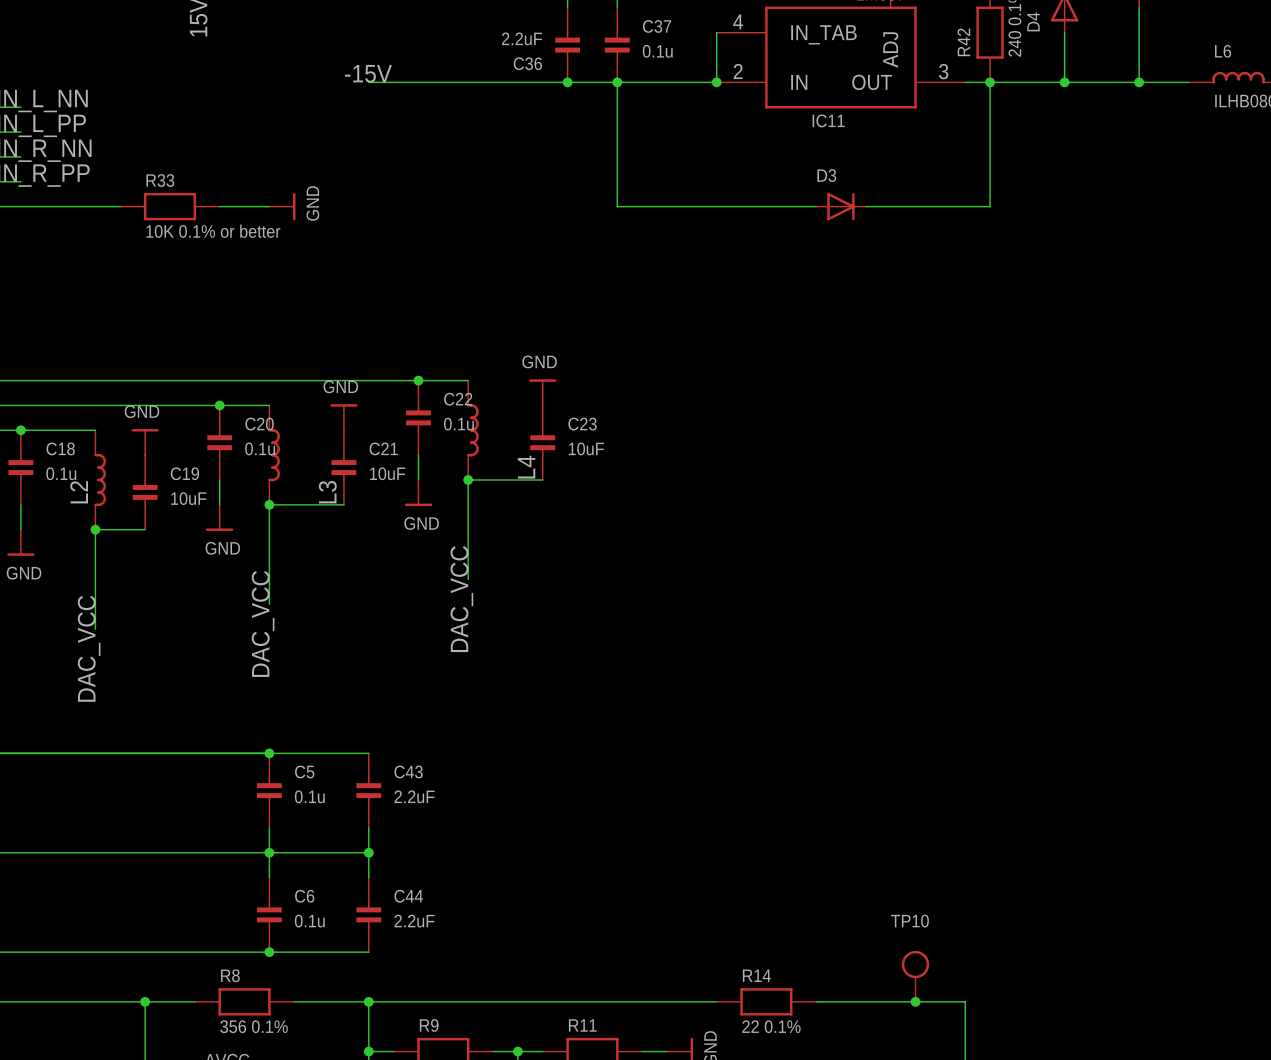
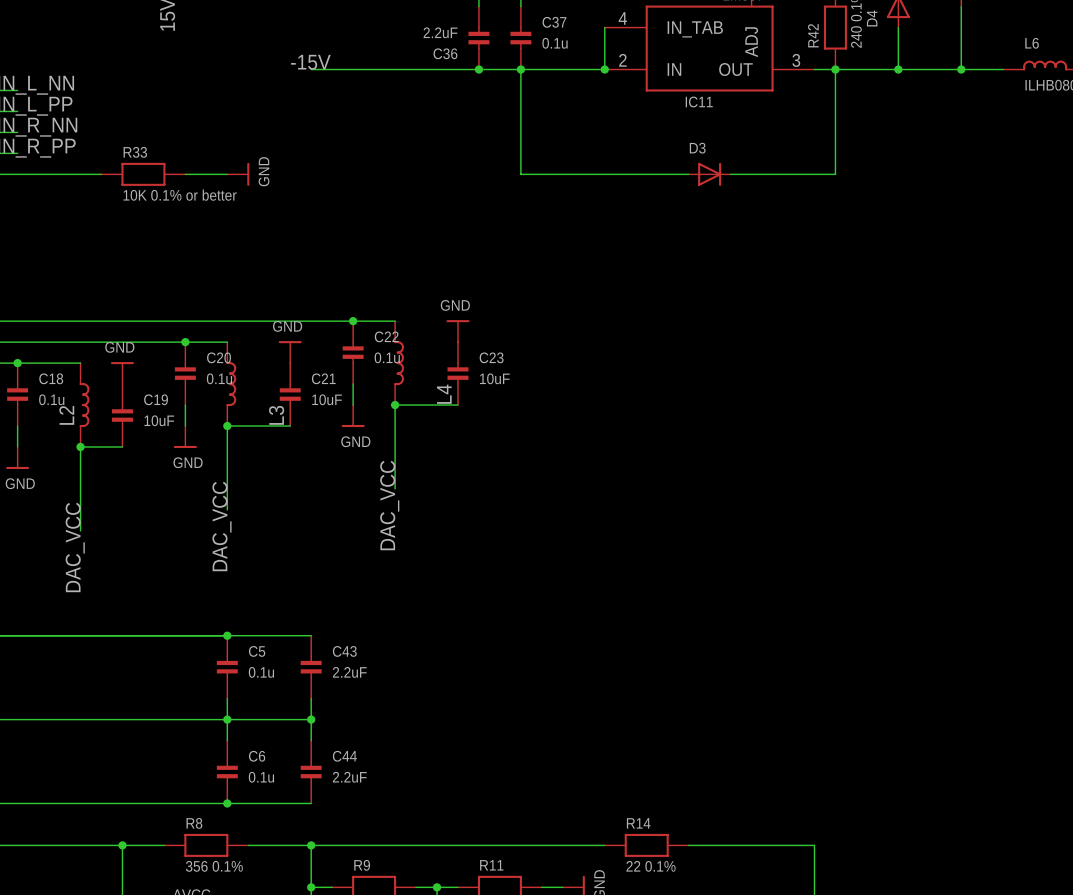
TP10: (915, 976) -> none
junction: (915, 1001) -> none

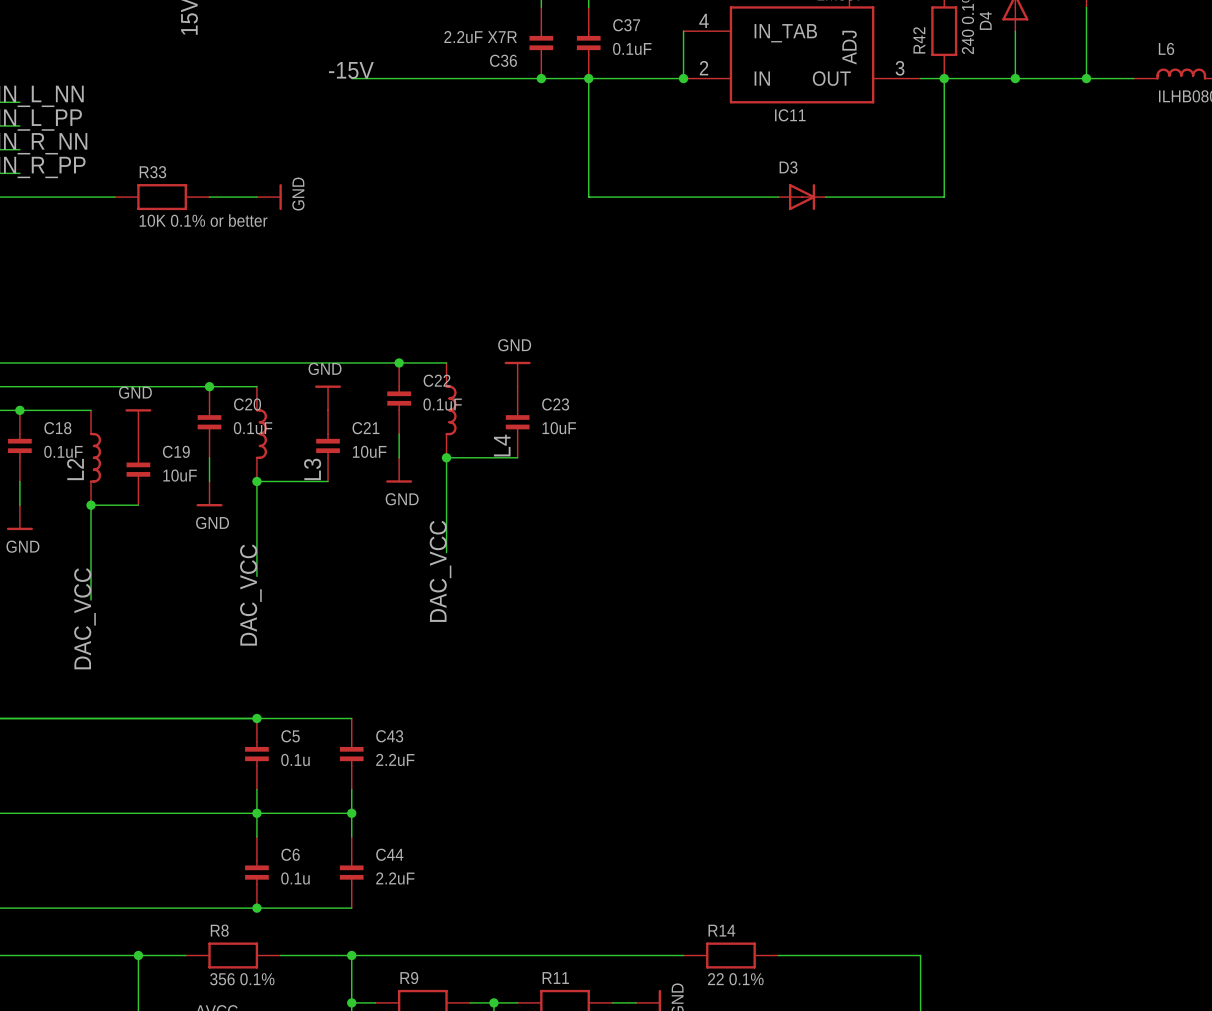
C36 value: 2.2uF (440, 32) -> 2.2uF X7R (480, 37)
C37 value: 0.1u (555, 43) -> 0.1uF (632, 48)
C22 value: 0.1u (387, 357) -> 0.1uF (442, 404)
C20 value: 0.1u (219, 378) -> 0.1uF (253, 428)
C18 value: 0.1u (51, 399) -> 0.1uF (63, 451)

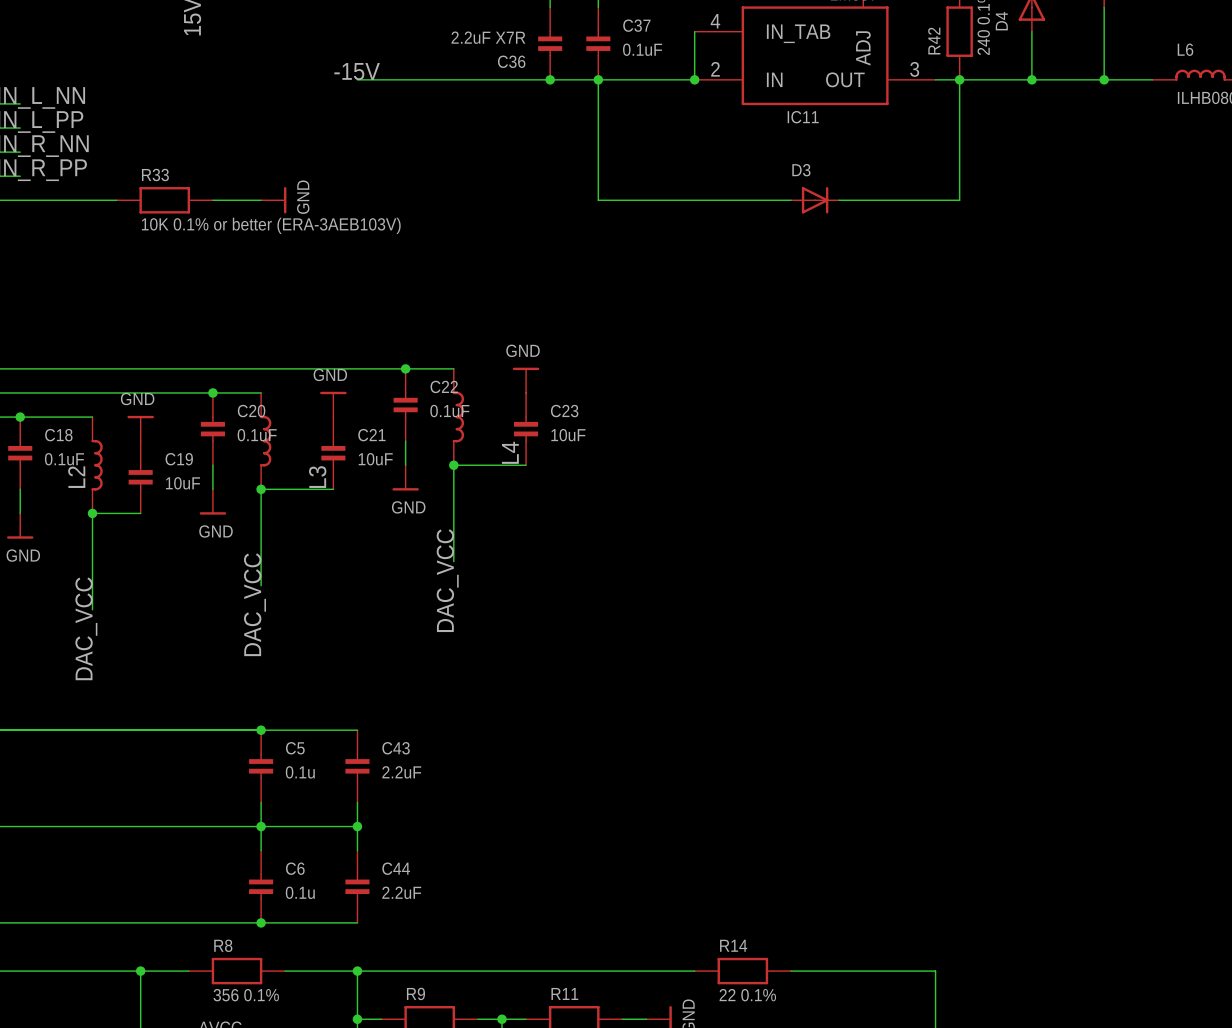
R33 value: 10K 0.1% or better (203, 220) -> 10K 0.1% or better (ERA-3AEB103V) (271, 225)

